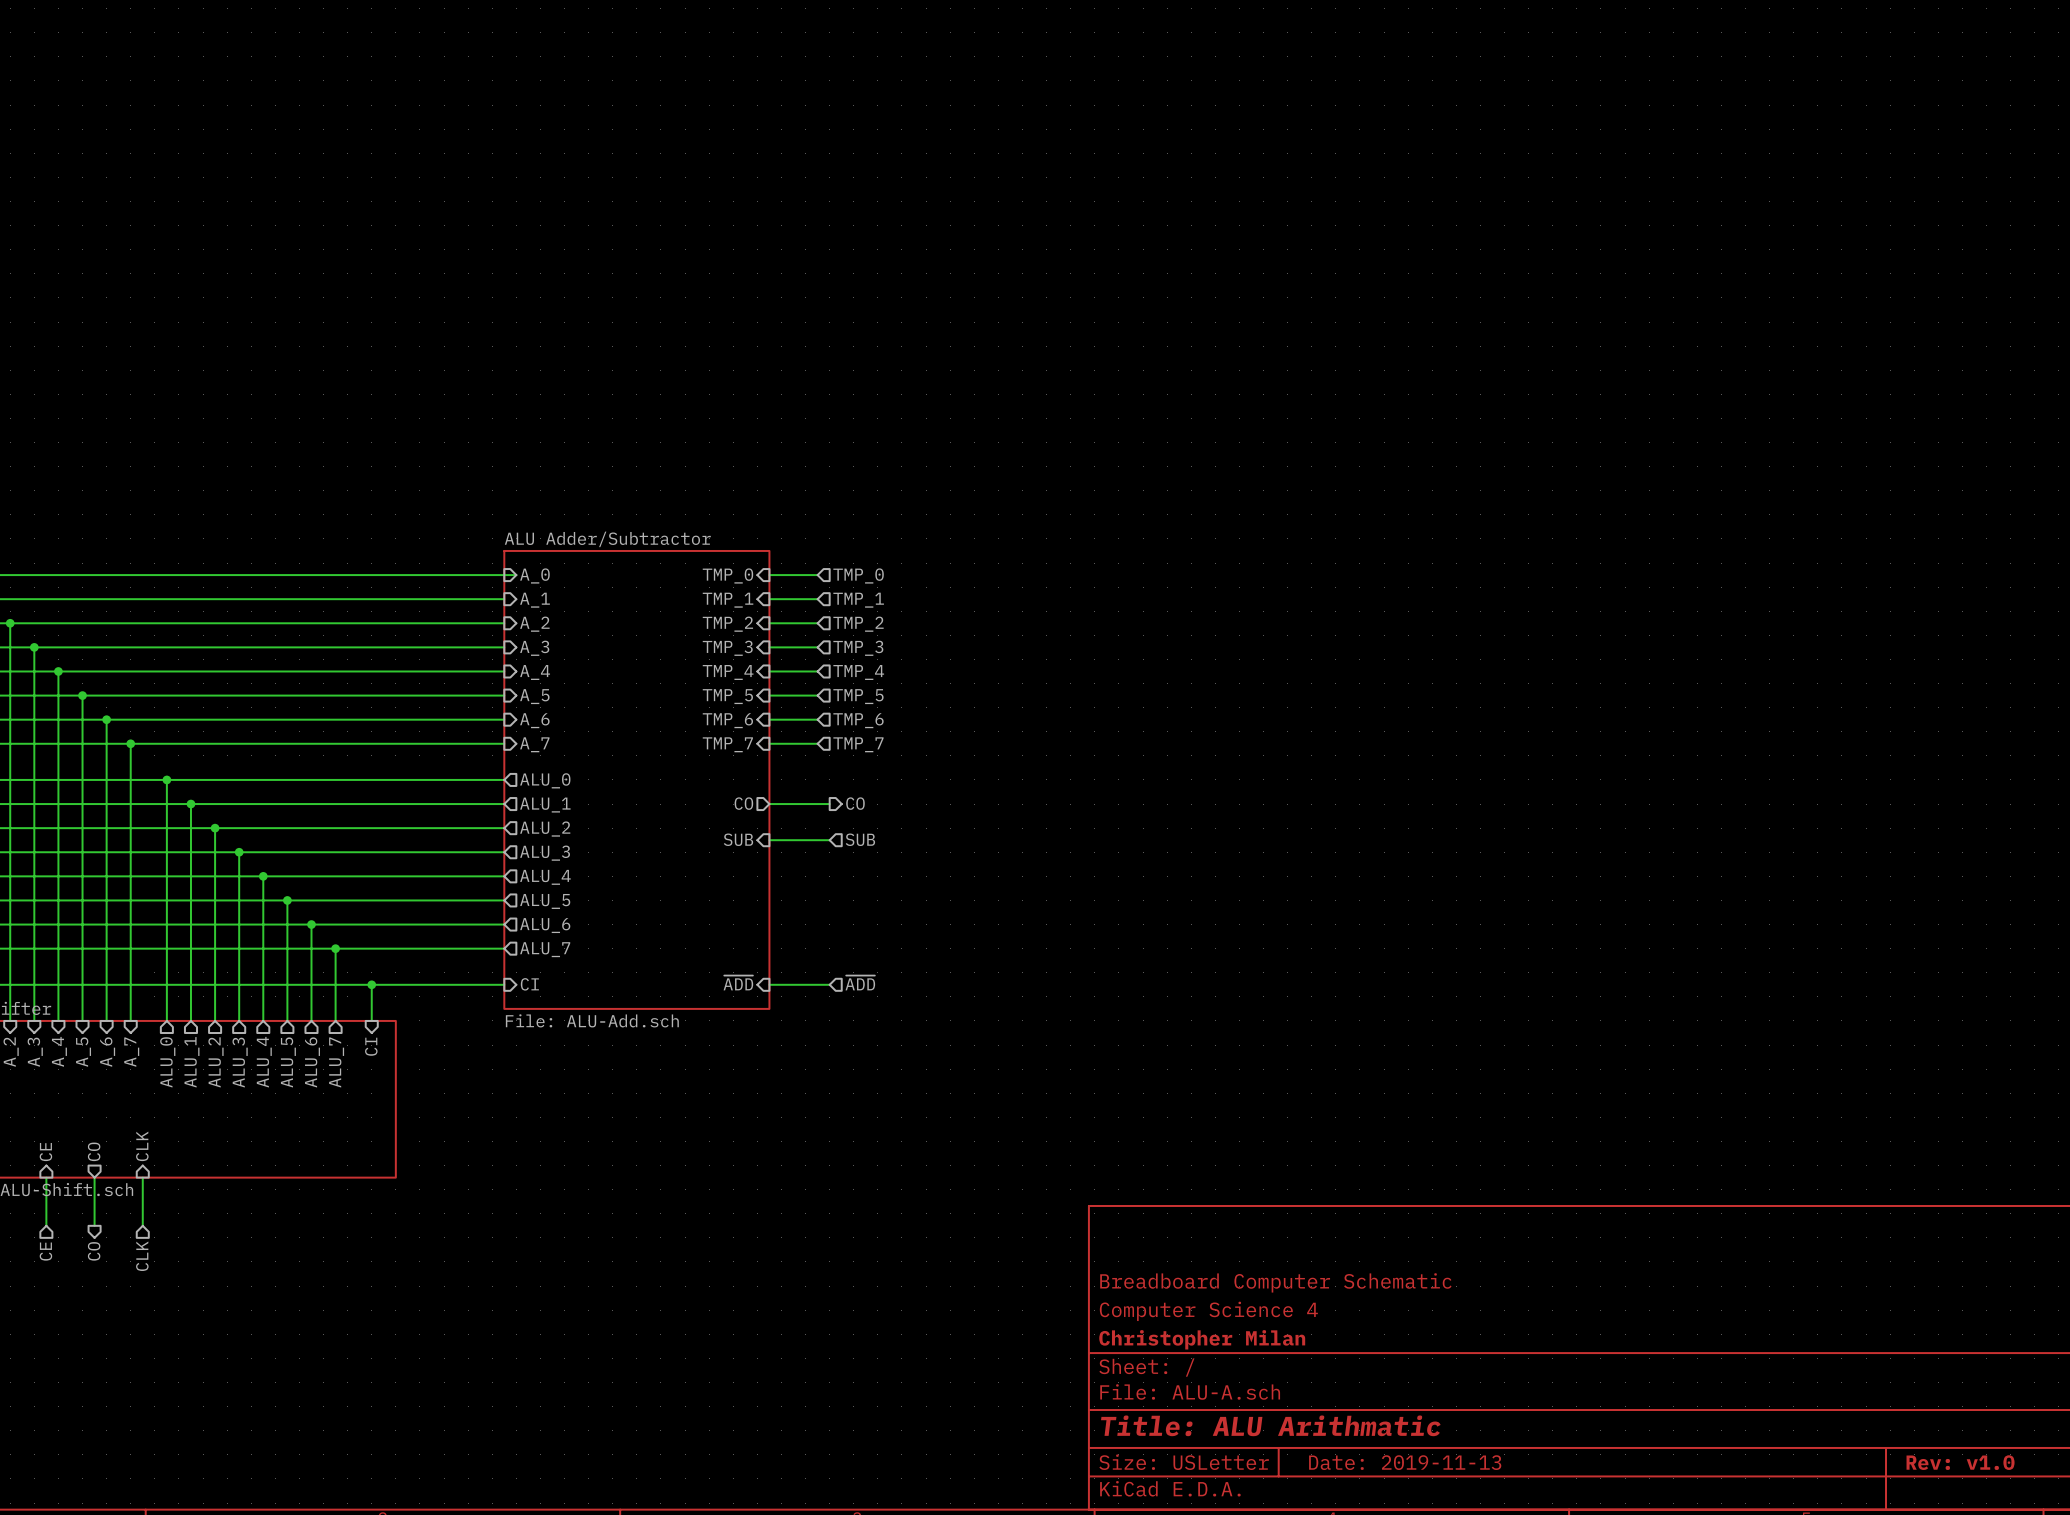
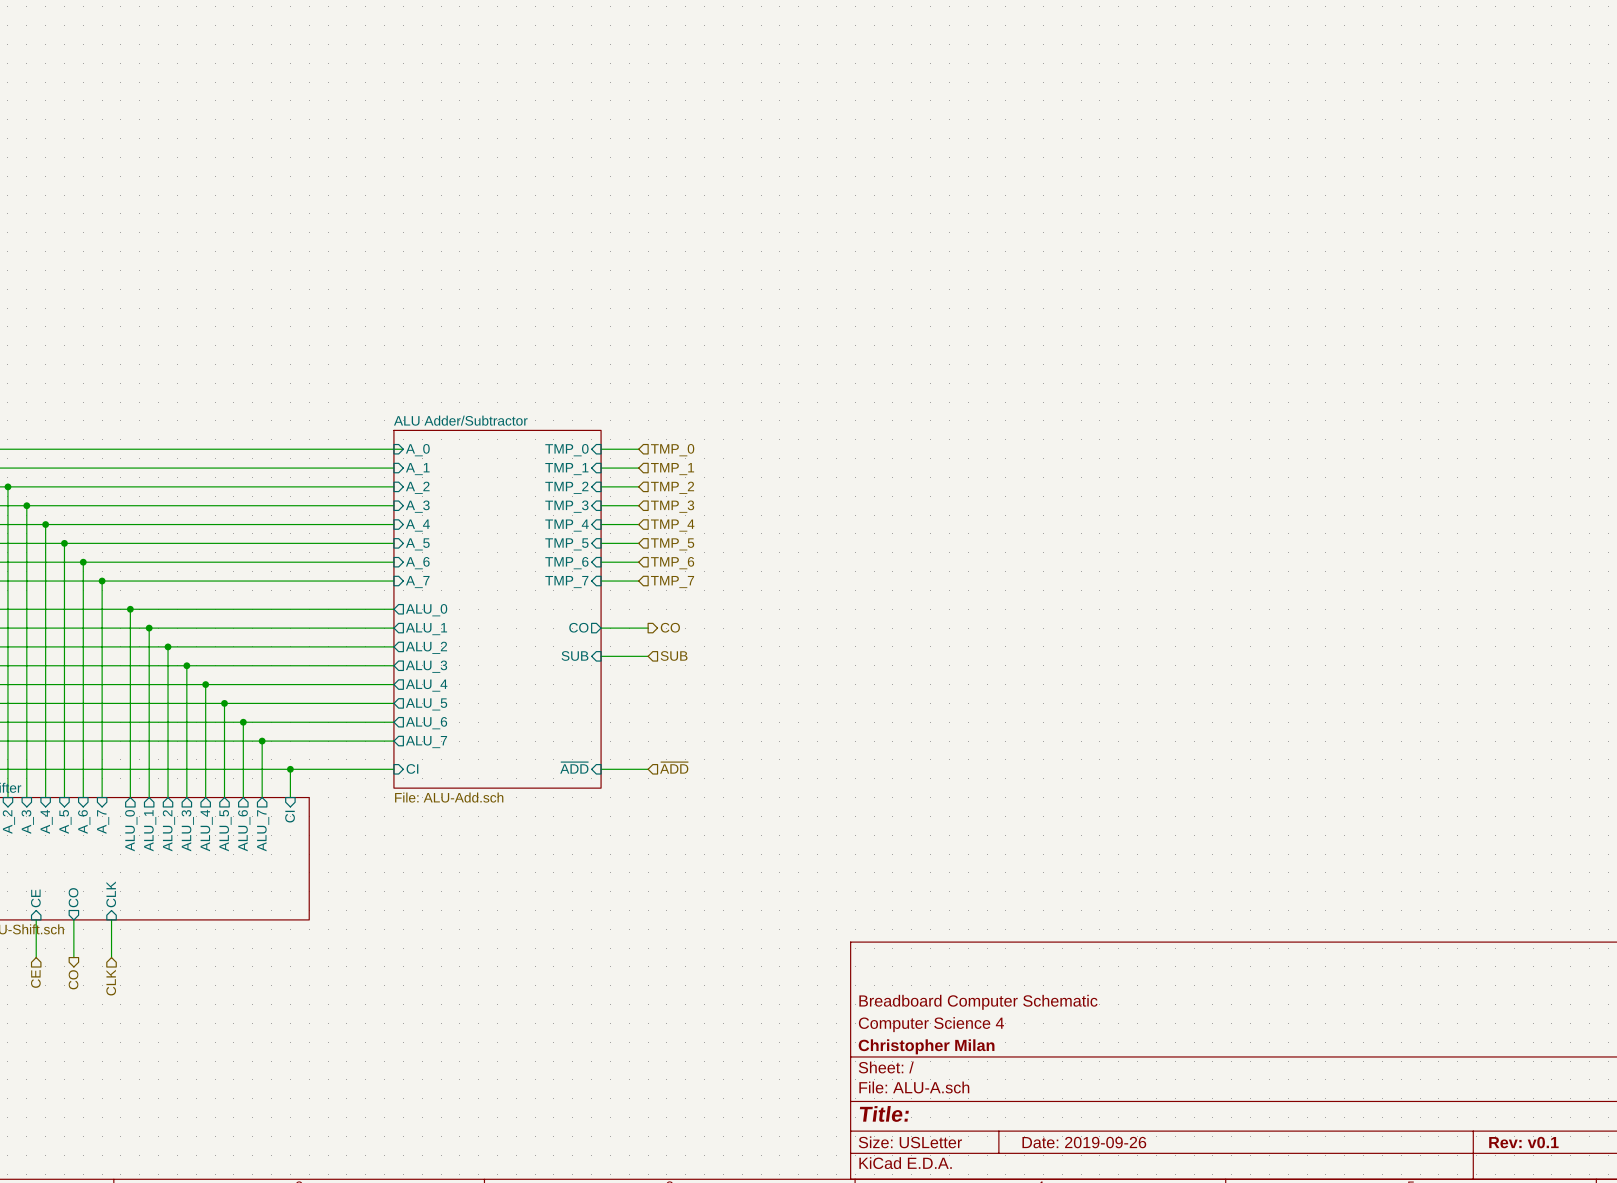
title block: Title: ALU Arithmatic (1270, 1425) -> Title: (884, 1113)
title block: Date: 2019-11-13 (1405, 1462) -> Date: 2019-09-26 (1084, 1142)
title block: Rev: v1.0 (1960, 1462) -> Rev: v0.1 (1523, 1142)

